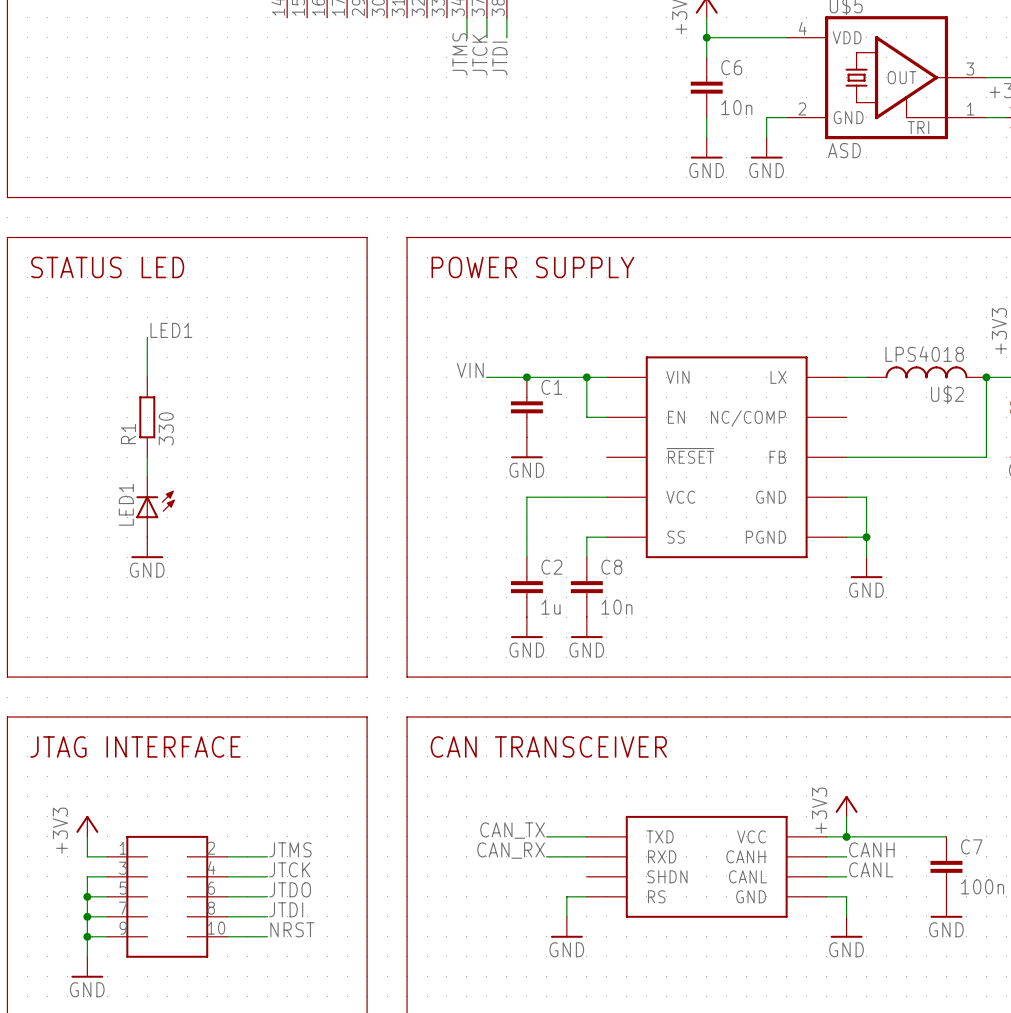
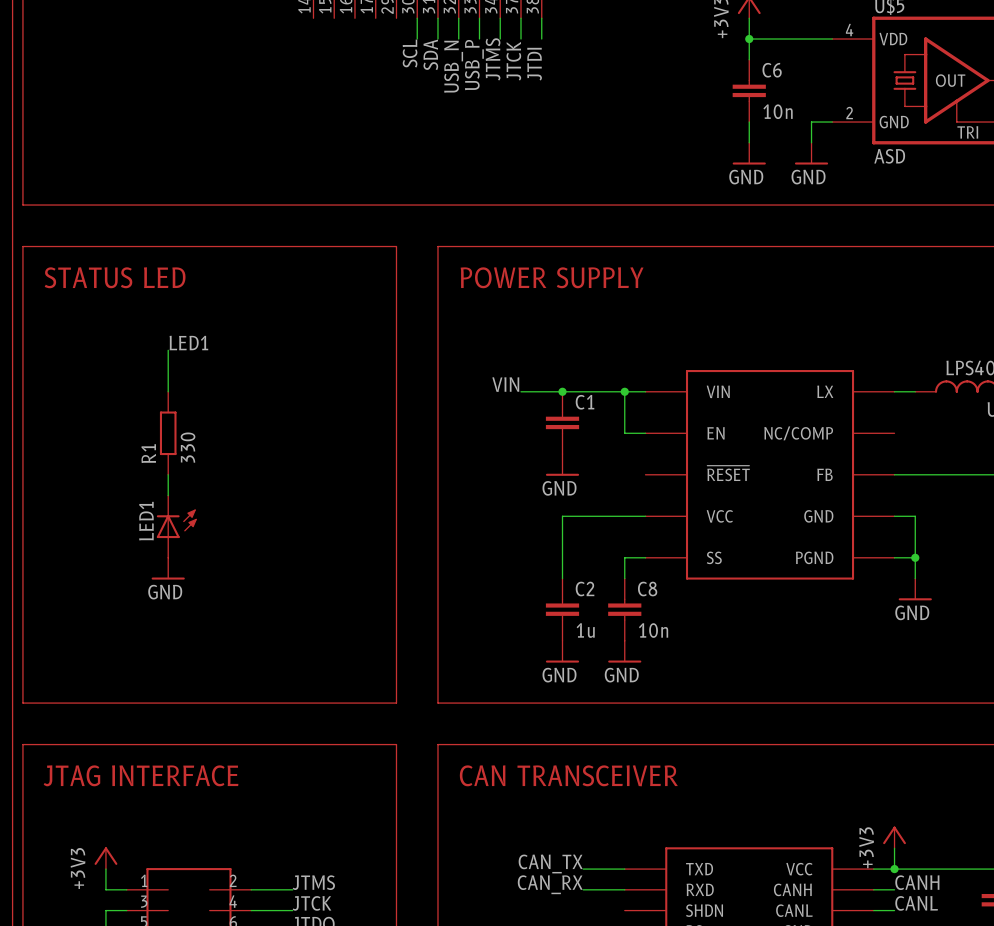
wire: none -> (417, 18) (417, 39)
wire: none -> (437, 18) (437, 39)
wire: none -> (458, 18) (458, 39)
wire: none -> (479, 18) (479, 39)
label: none -> SCL (410, 53)
label: none -> SDA (430, 54)
label: none -> USB_N (453, 66)
label: none -> USB_P (474, 65)

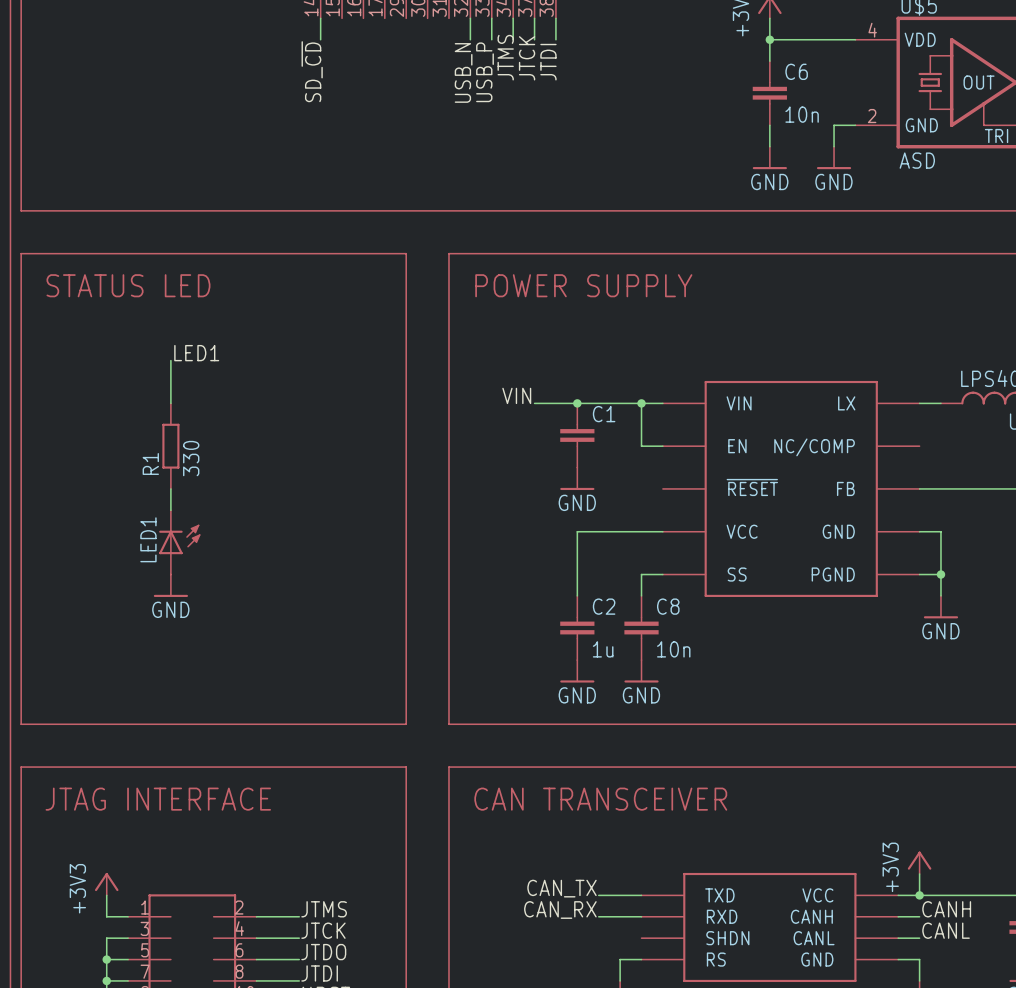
wire: (417, 18) (417, 39) -> (320, 18) (320, 39)
wire: (437, 18) (437, 39) -> none
label: SCL (410, 53) -> none
label: SDA (430, 54) -> none
label: none -> SD_~{CD} (312, 71)

